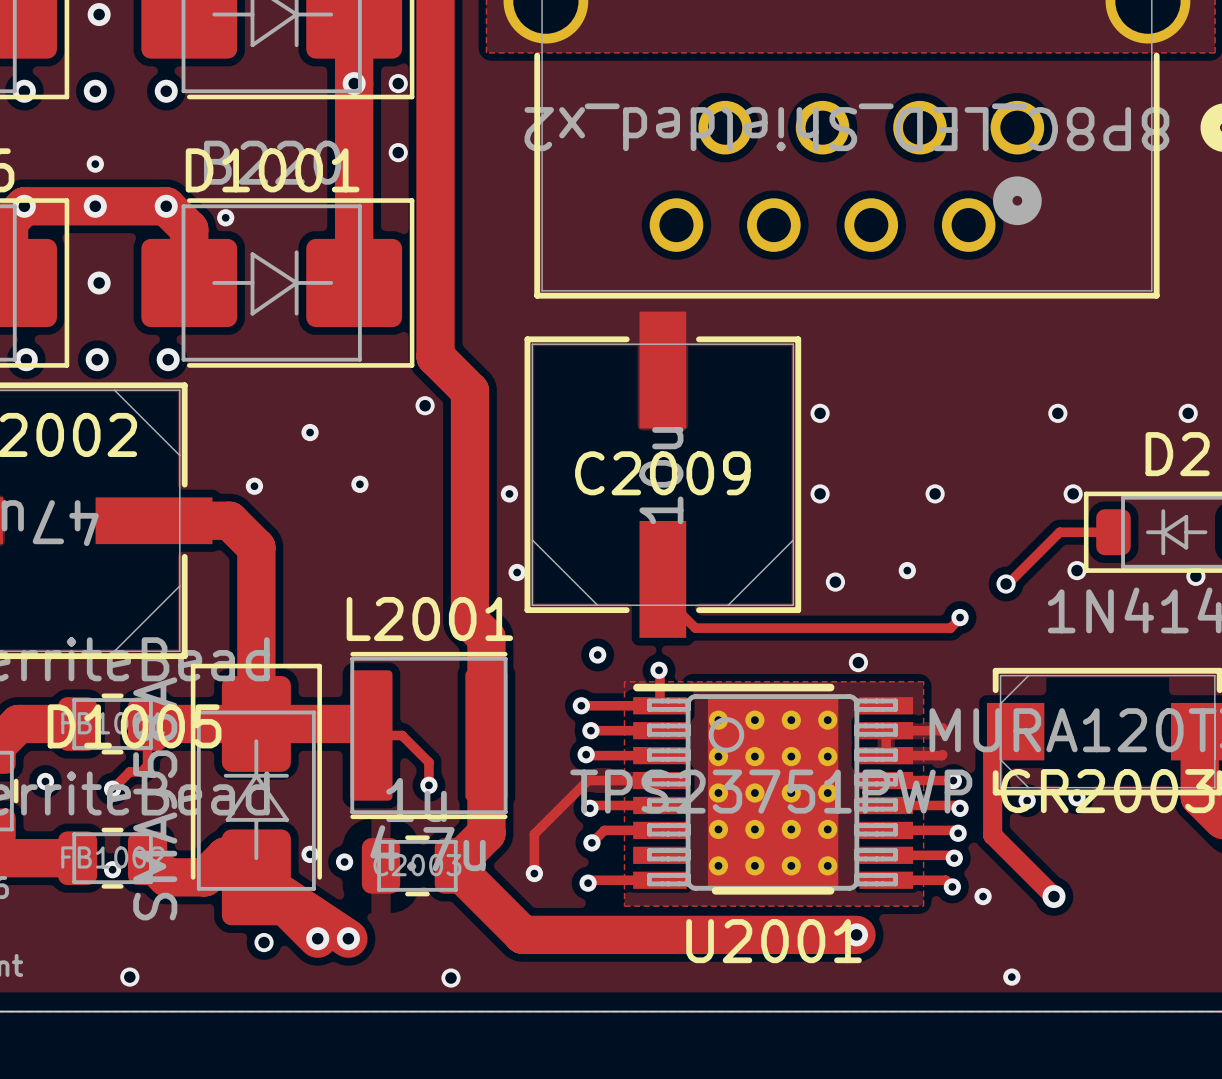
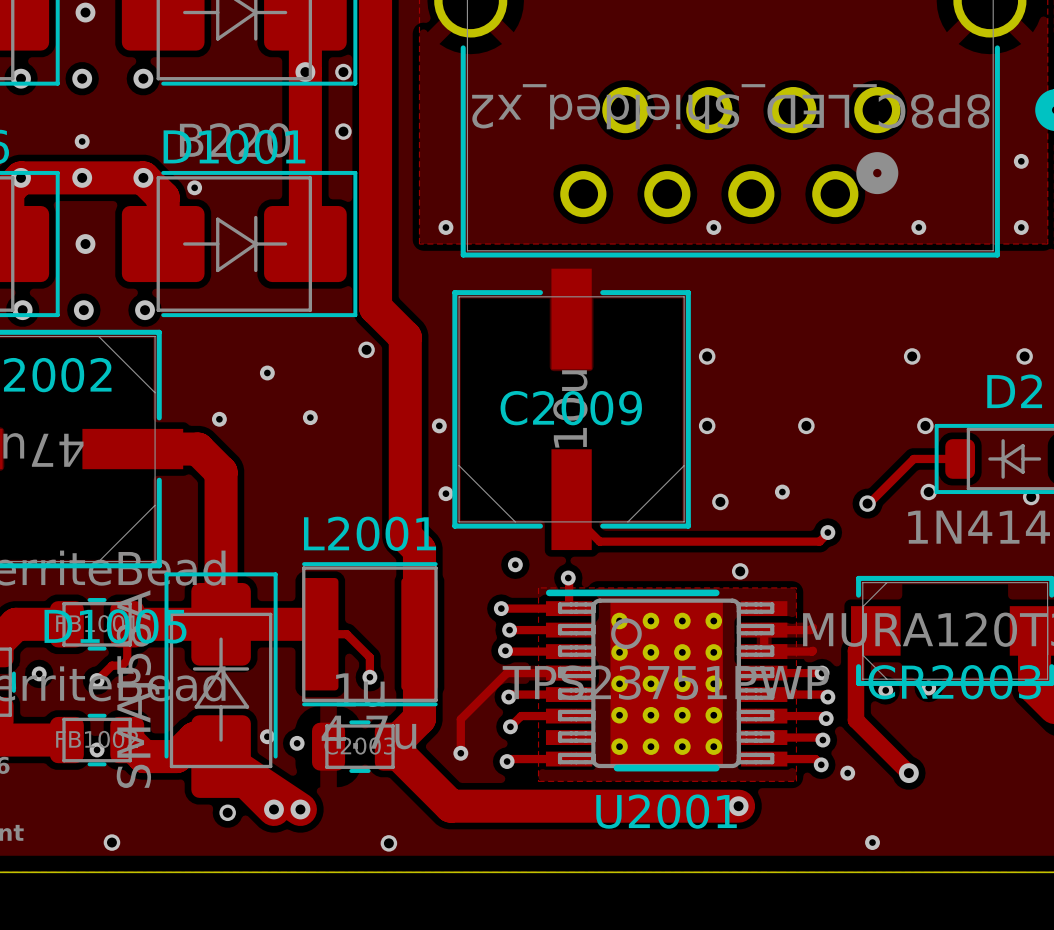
zone outline: (486, 52) (1215, 52) -> (419, 45) (419, 244) (1047, 244) (1047, 45)
via: none -> (1021, 161)
via: none -> (445, 227)
via: none -> (713, 227)
via: none -> (918, 227)
via: none -> (1021, 227)

